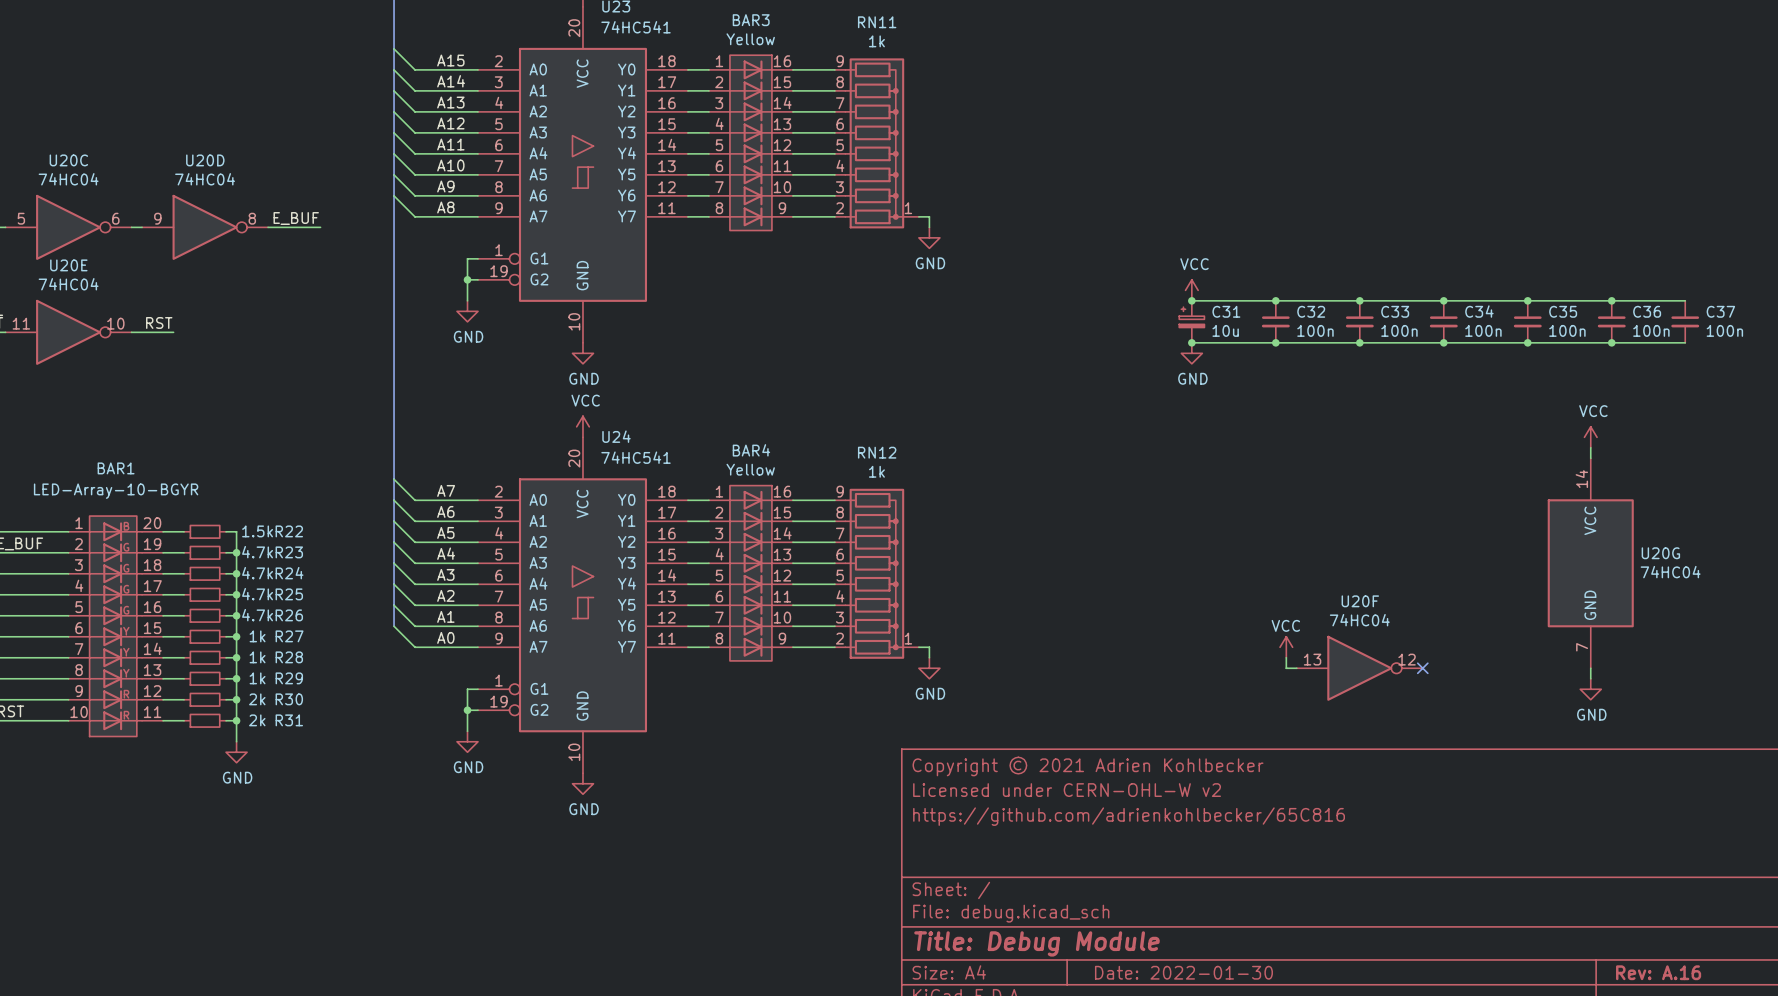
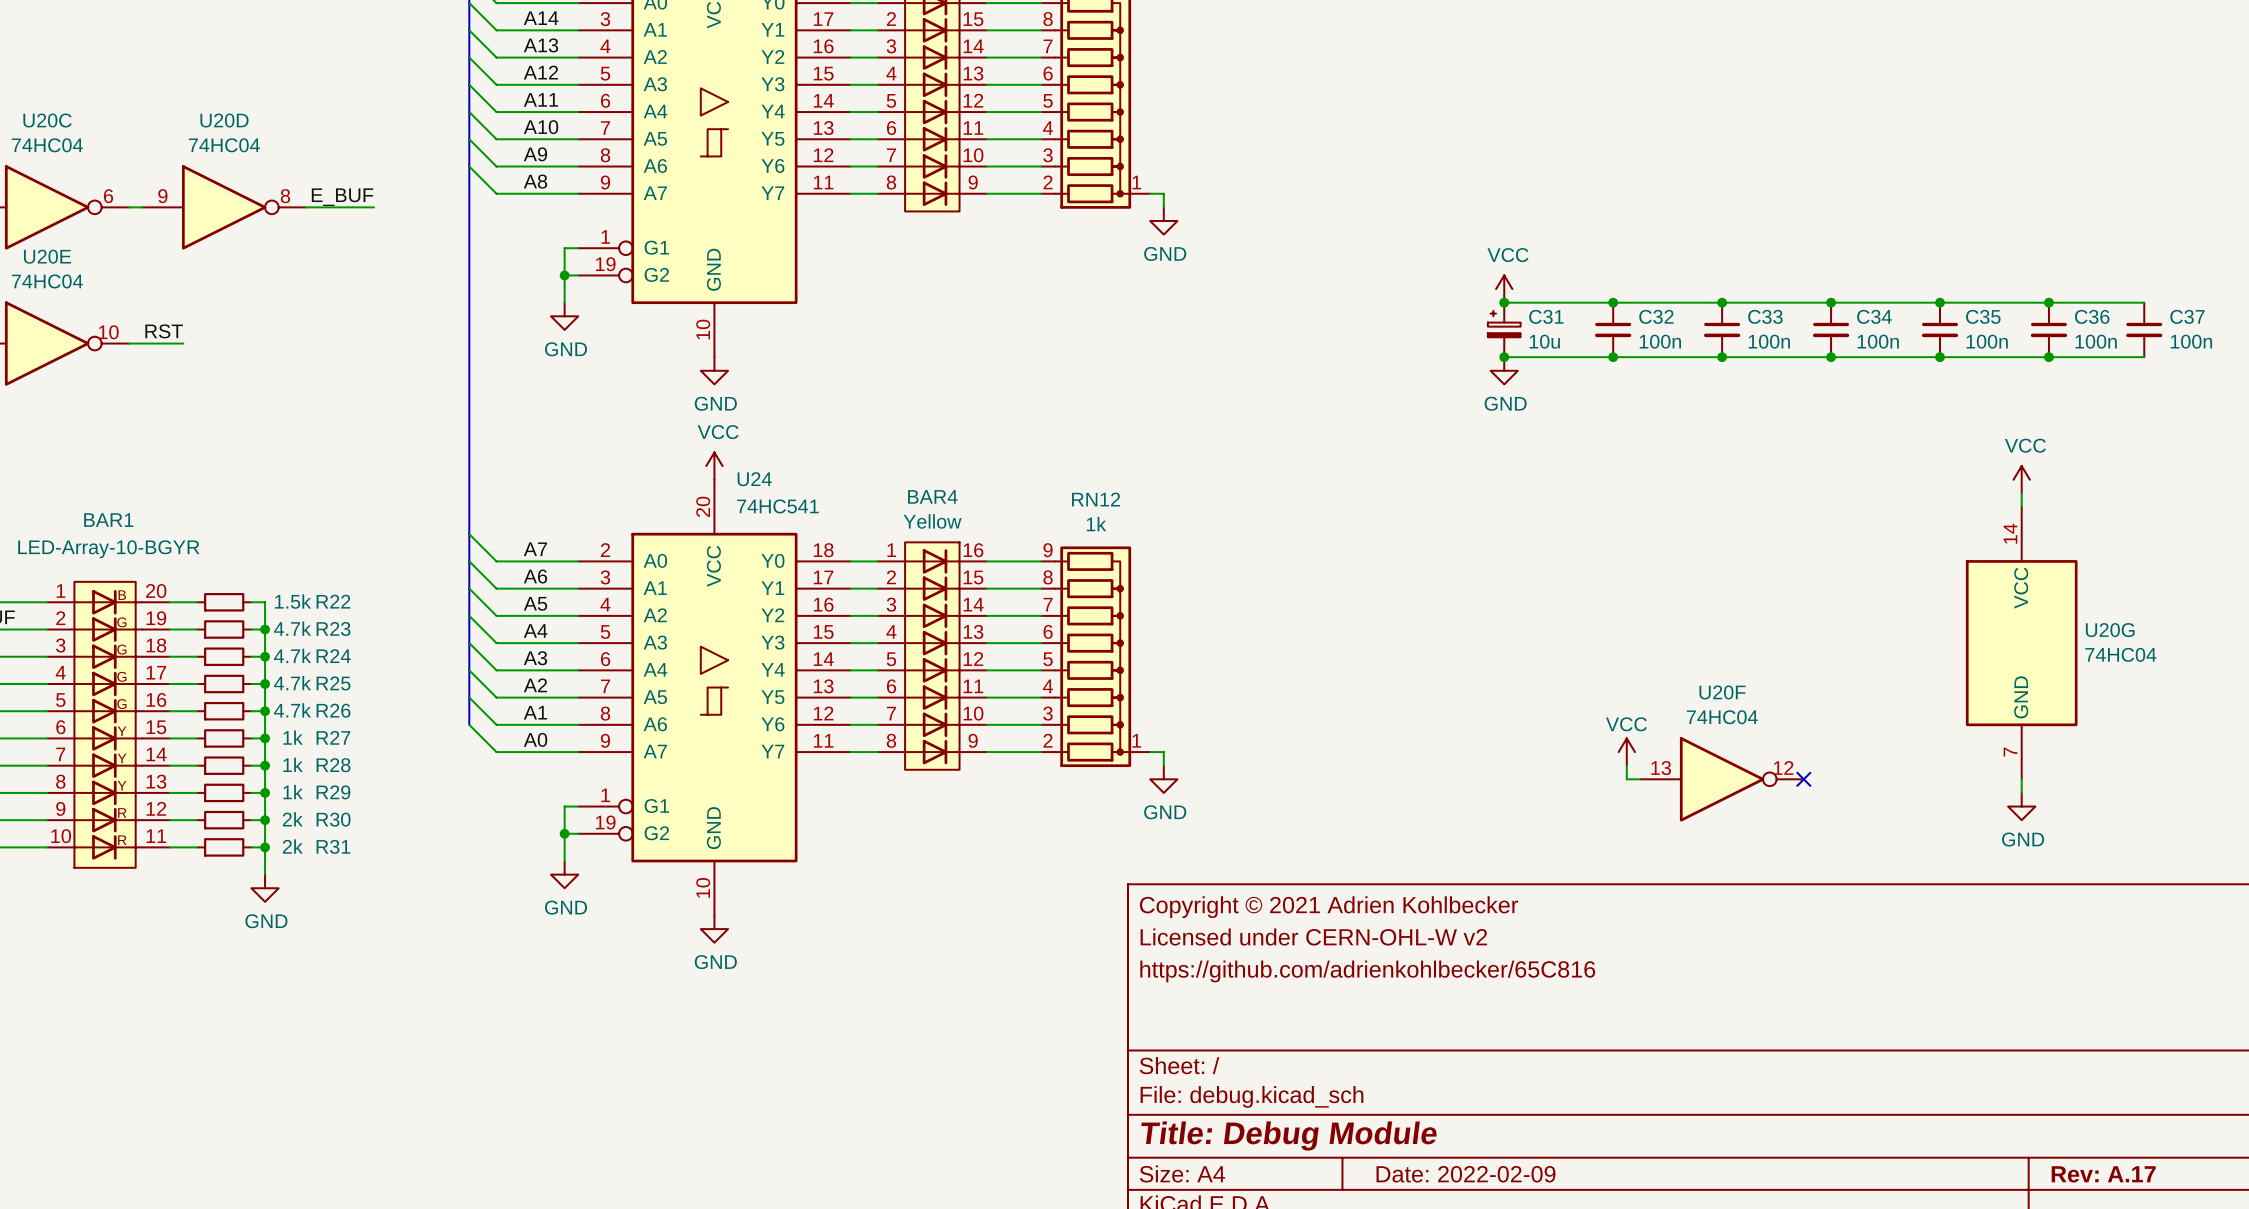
title block: Date: 2022-01-30 (1183, 972) -> Date: 2022-02-09 (1465, 1174)
title block: Rev: A.16 (1658, 972) -> Rev: A.17 (2103, 1174)

